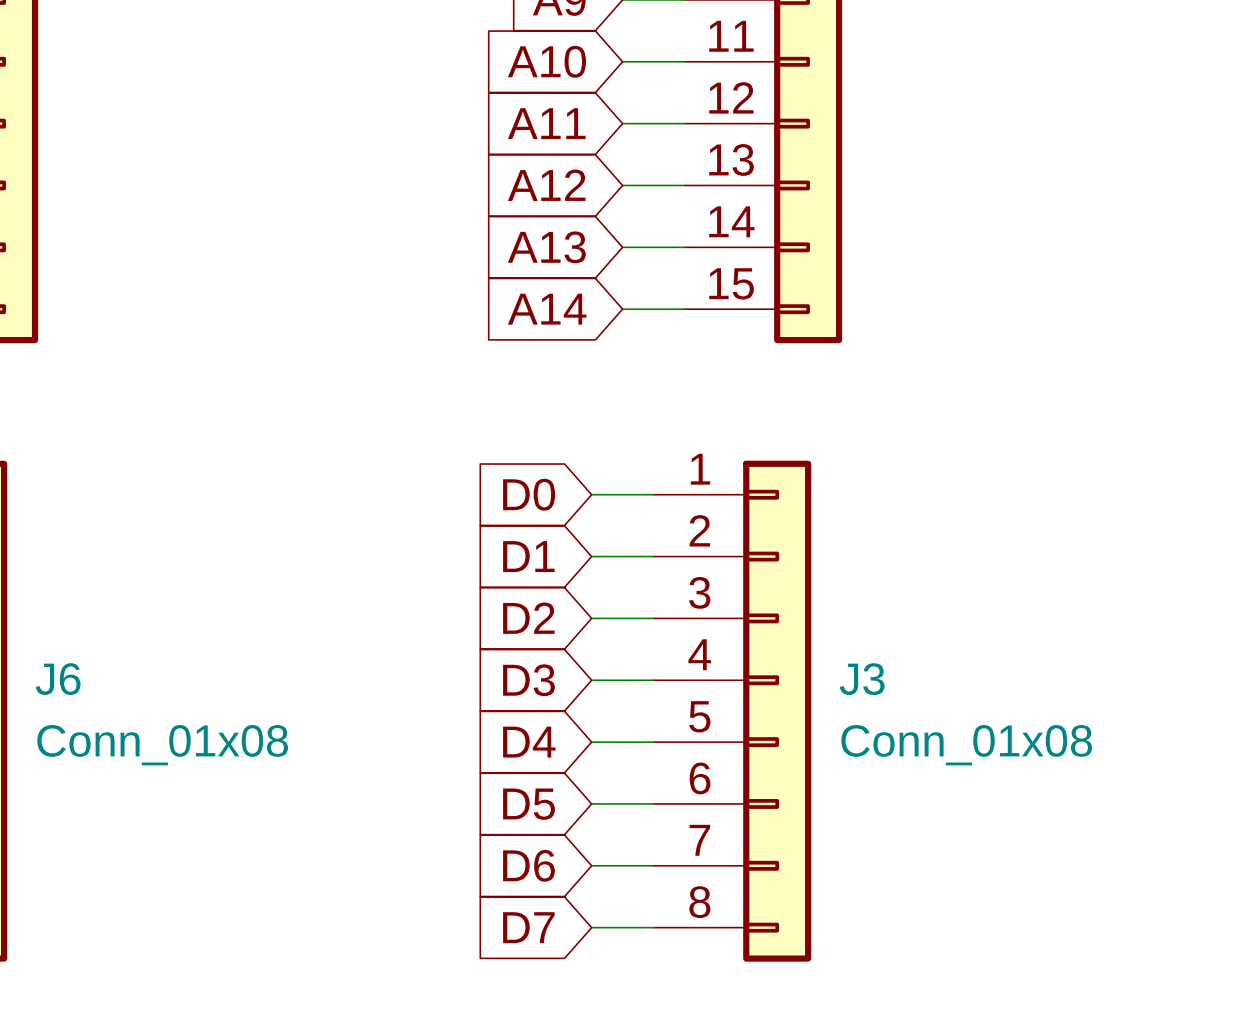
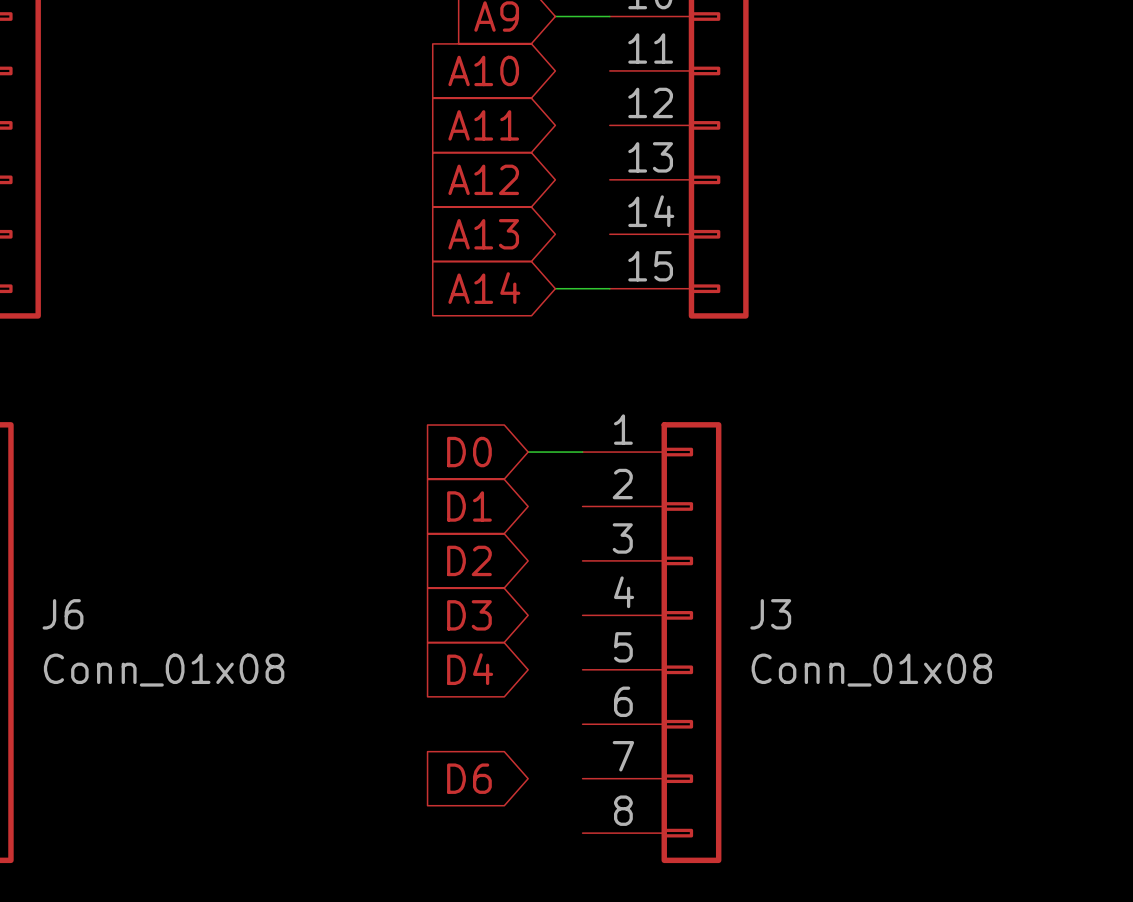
wire: (622, 61) (684, 61) -> none
wire: (622, 123) (684, 123) -> none
wire: (622, 185) (684, 185) -> none
wire: (622, 247) (684, 247) -> none
wire: (591, 556) (653, 556) -> none
wire: (591, 618) (653, 618) -> none
wire: (591, 680) (653, 680) -> none
wire: (591, 742) (653, 742) -> none
wire: (591, 803) (653, 803) -> none
global label: D5 (529, 804) -> none
wire: (591, 865) (653, 865) -> none
global label: D7 (528, 927) -> none
wire: (591, 927) (653, 927) -> none

